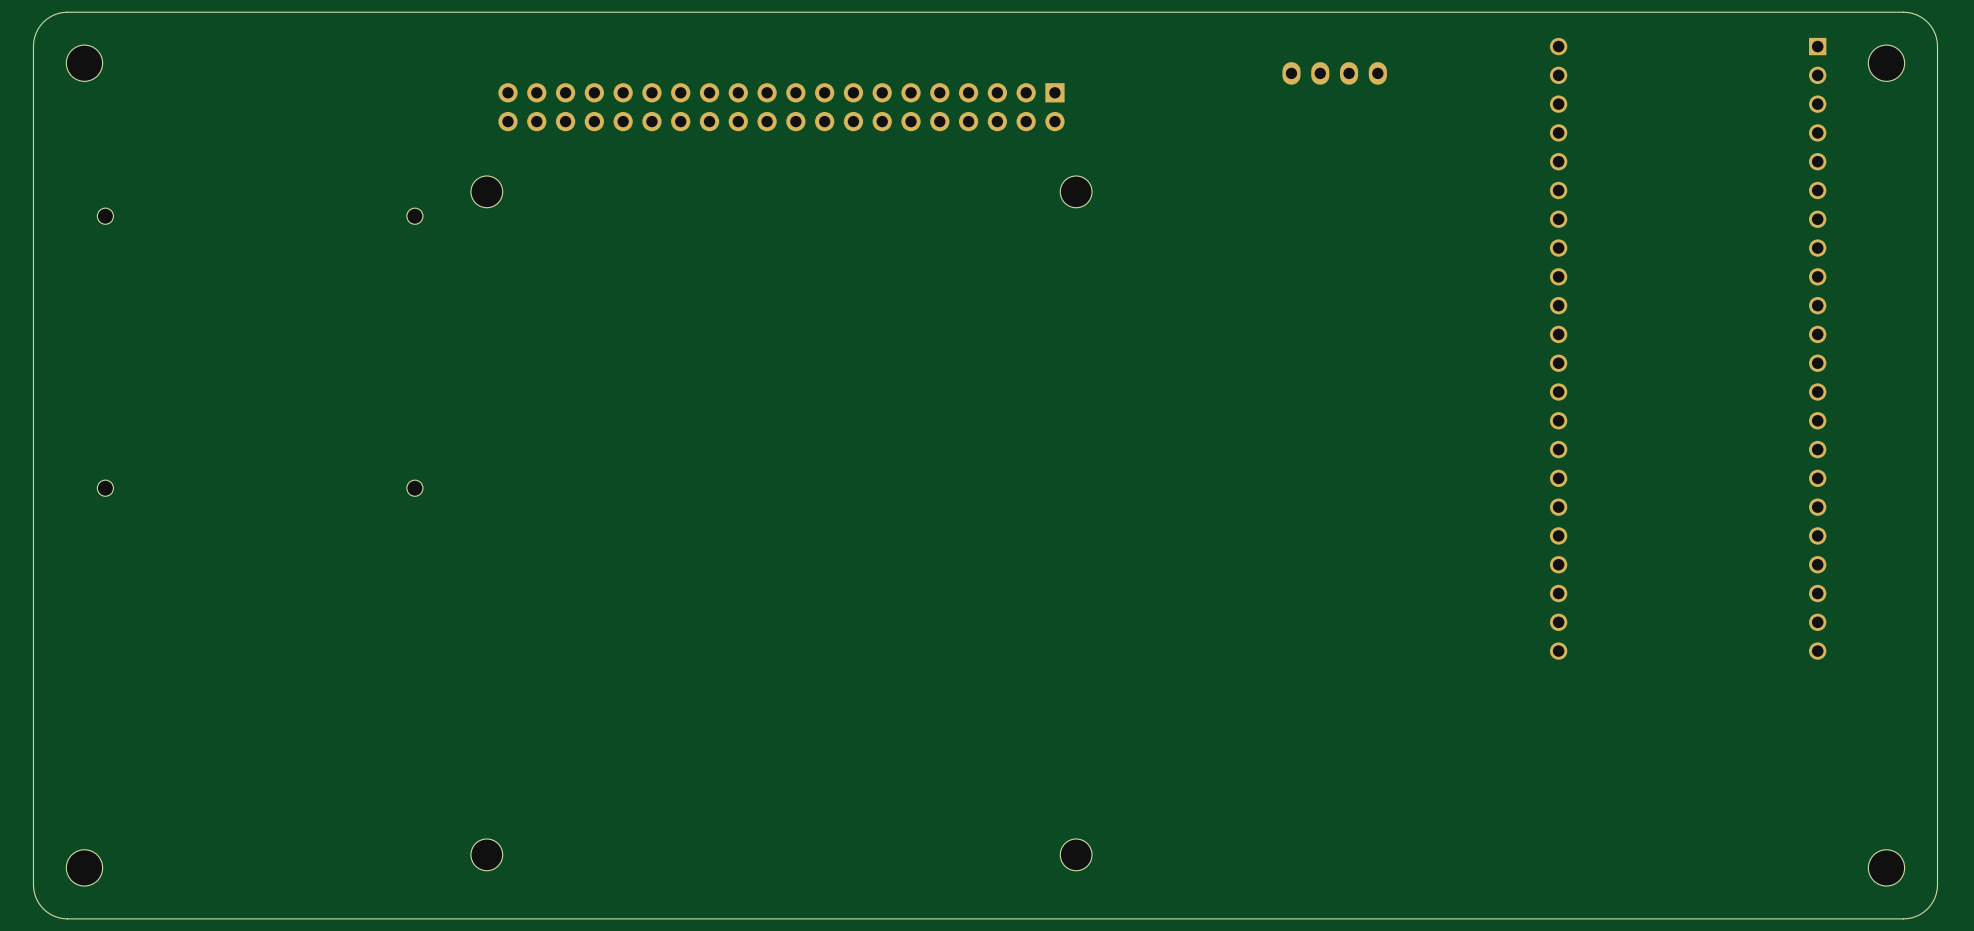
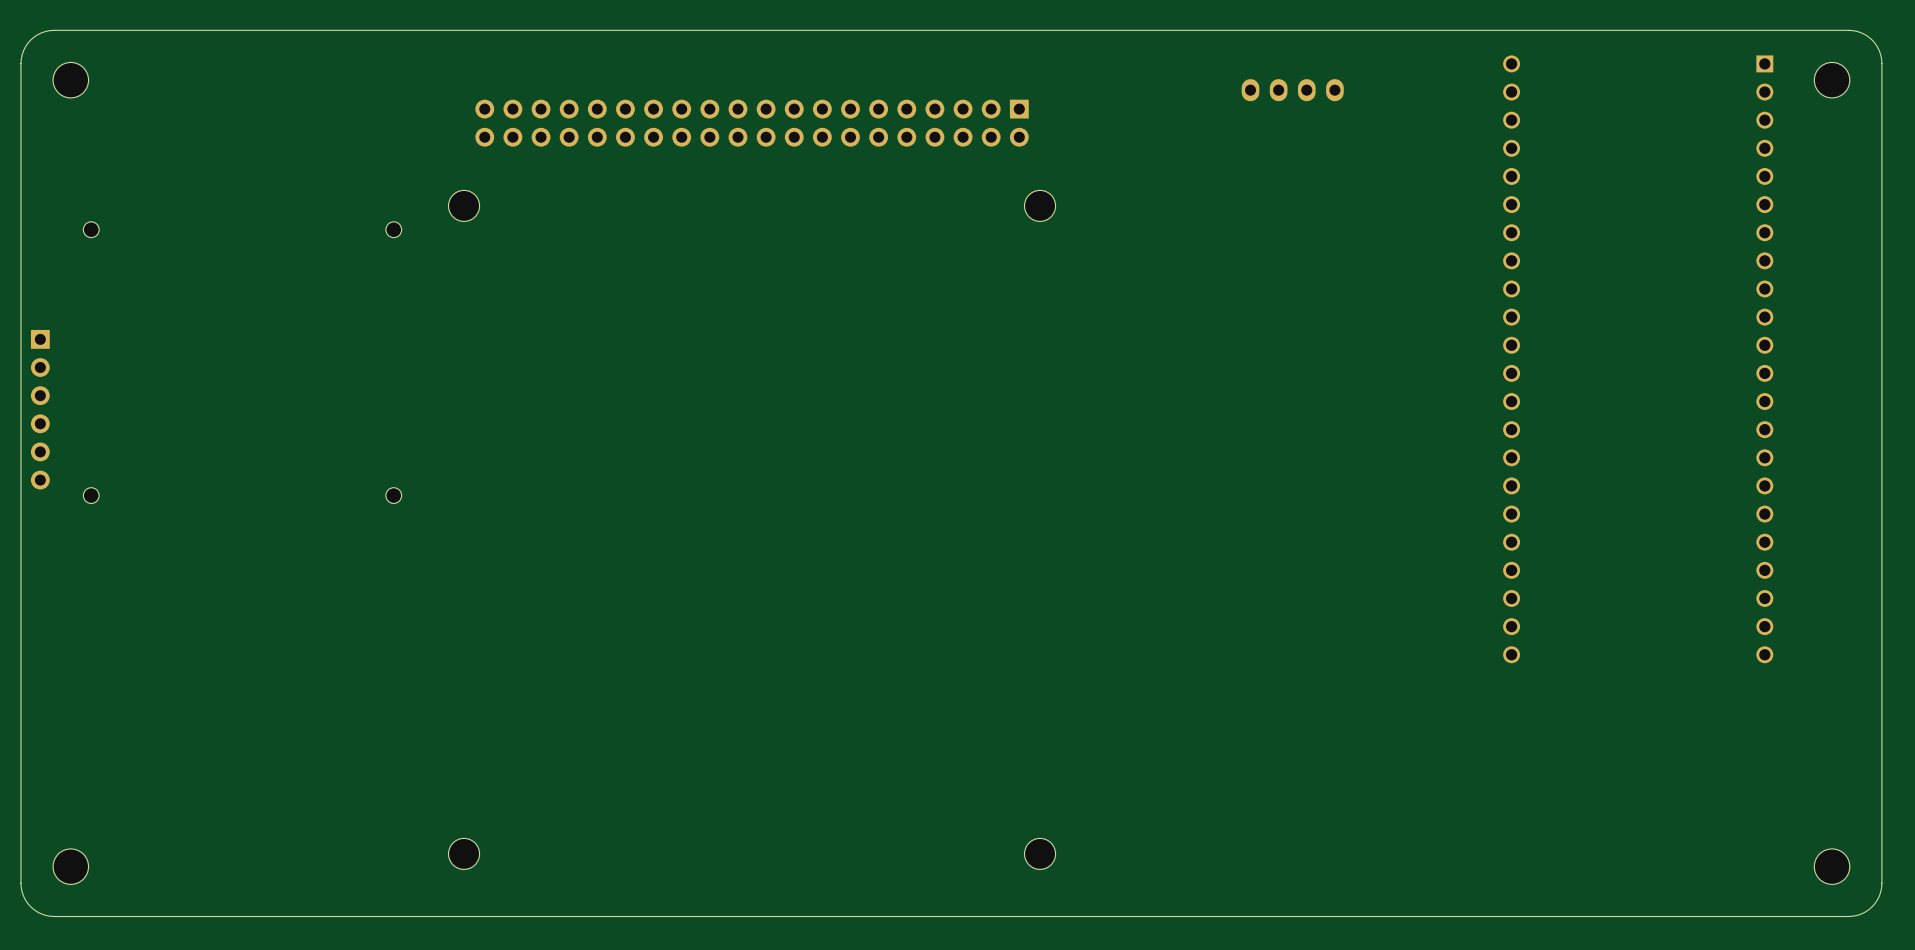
part: none -> (40, 409)

